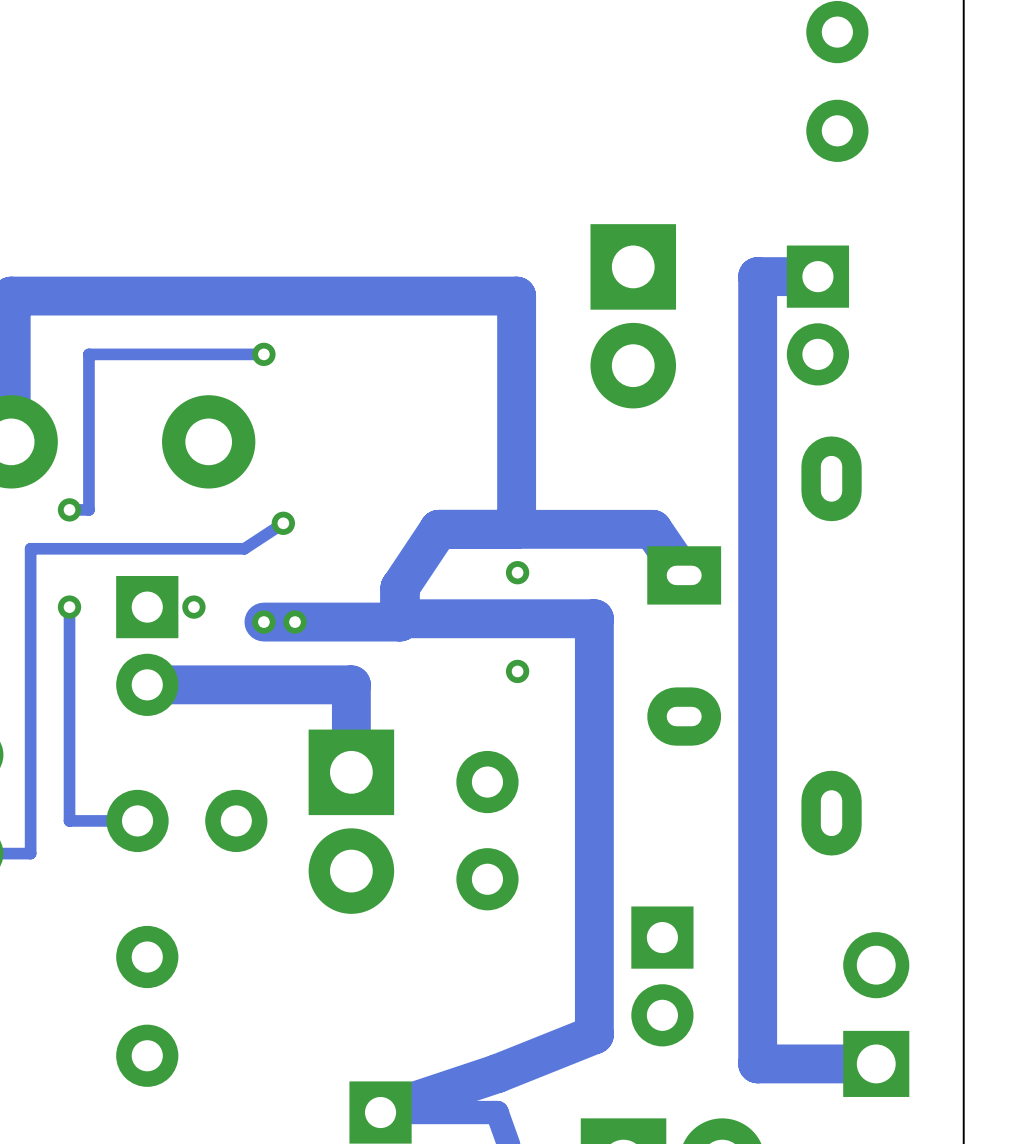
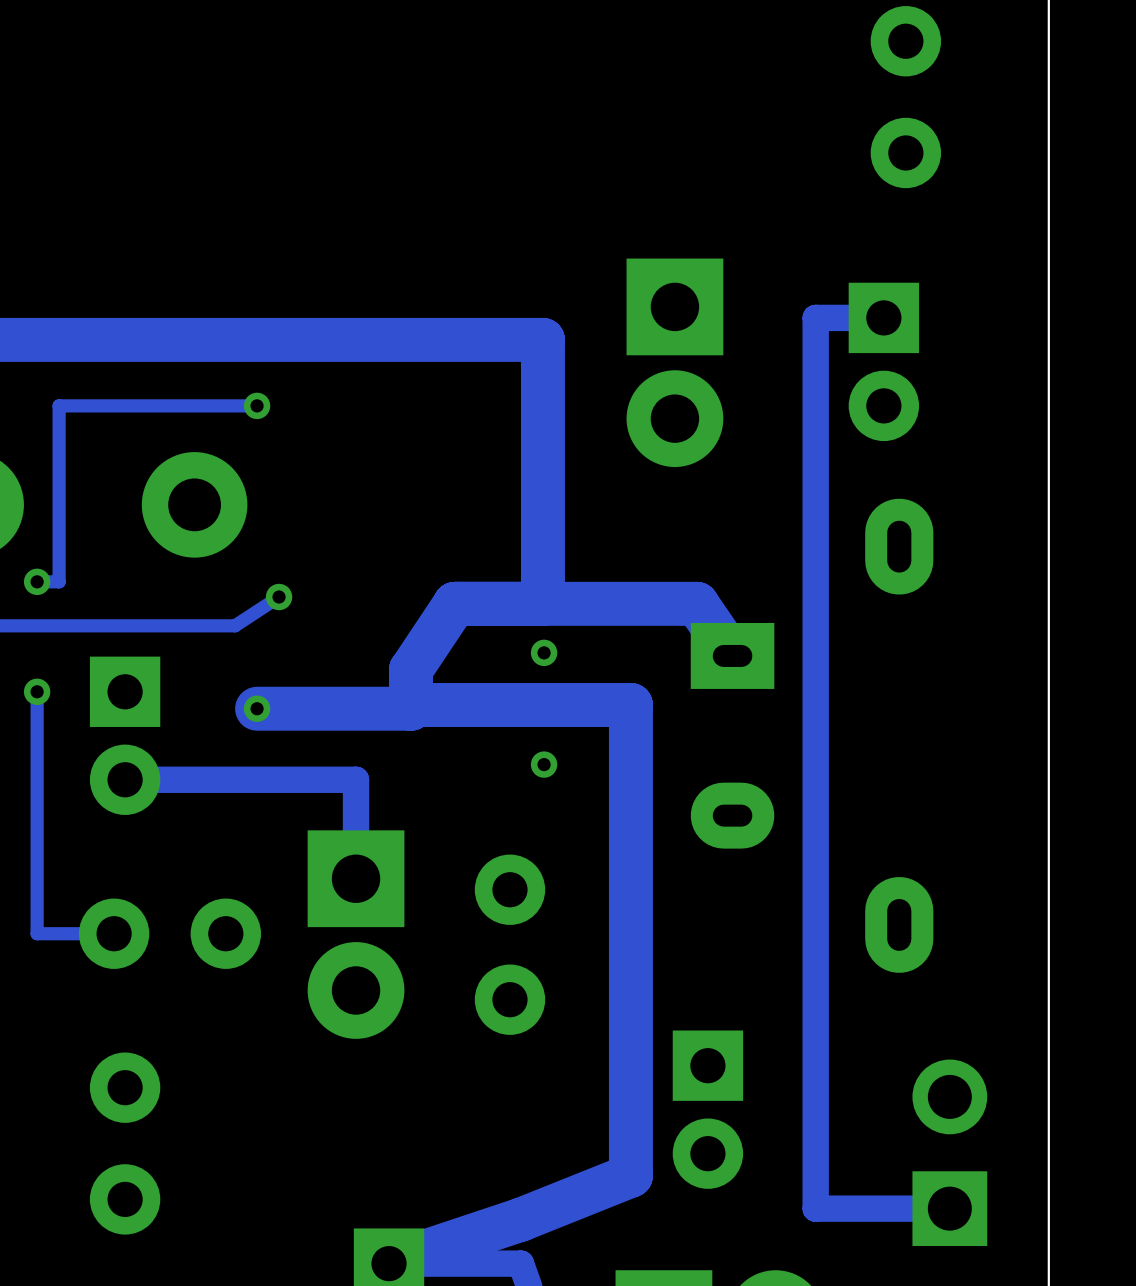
track width: thick (817, 276) (757, 276) (757, 1063) (876, 1063) -> thin (883, 317) (815, 317) (815, 1208) (949, 1208)
via: (193, 607) -> none
via: (295, 622) -> none
track width: thick (147, 684) (351, 684) (351, 772) -> thin (125, 779) (356, 779) (356, 878)

